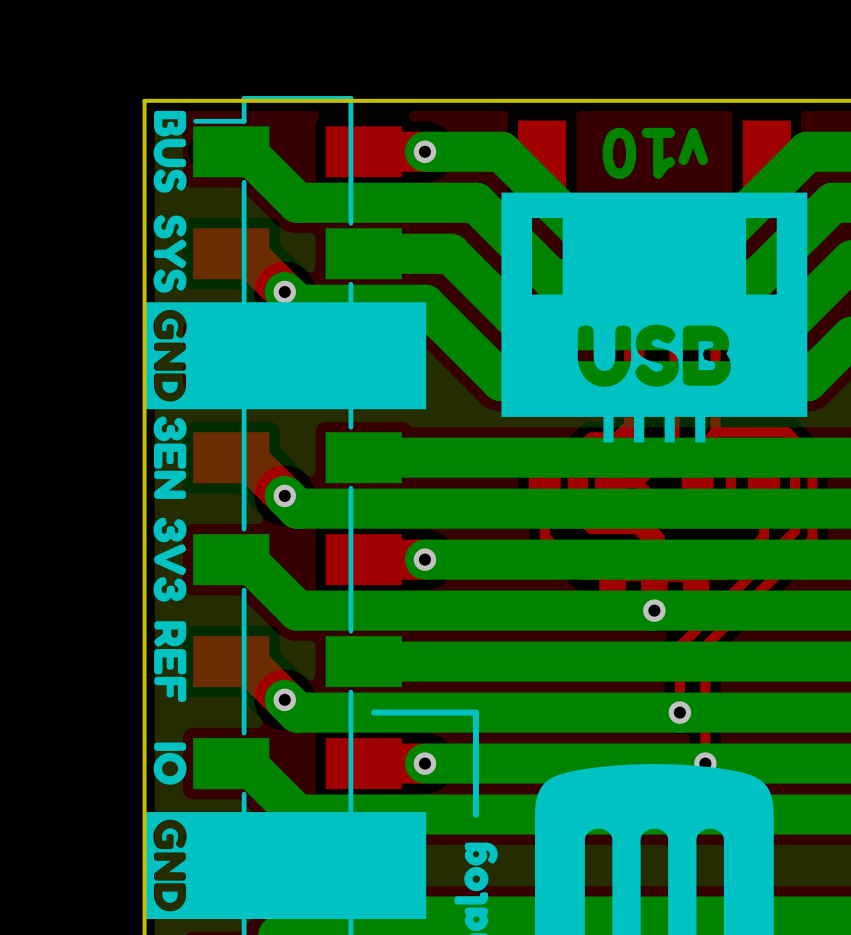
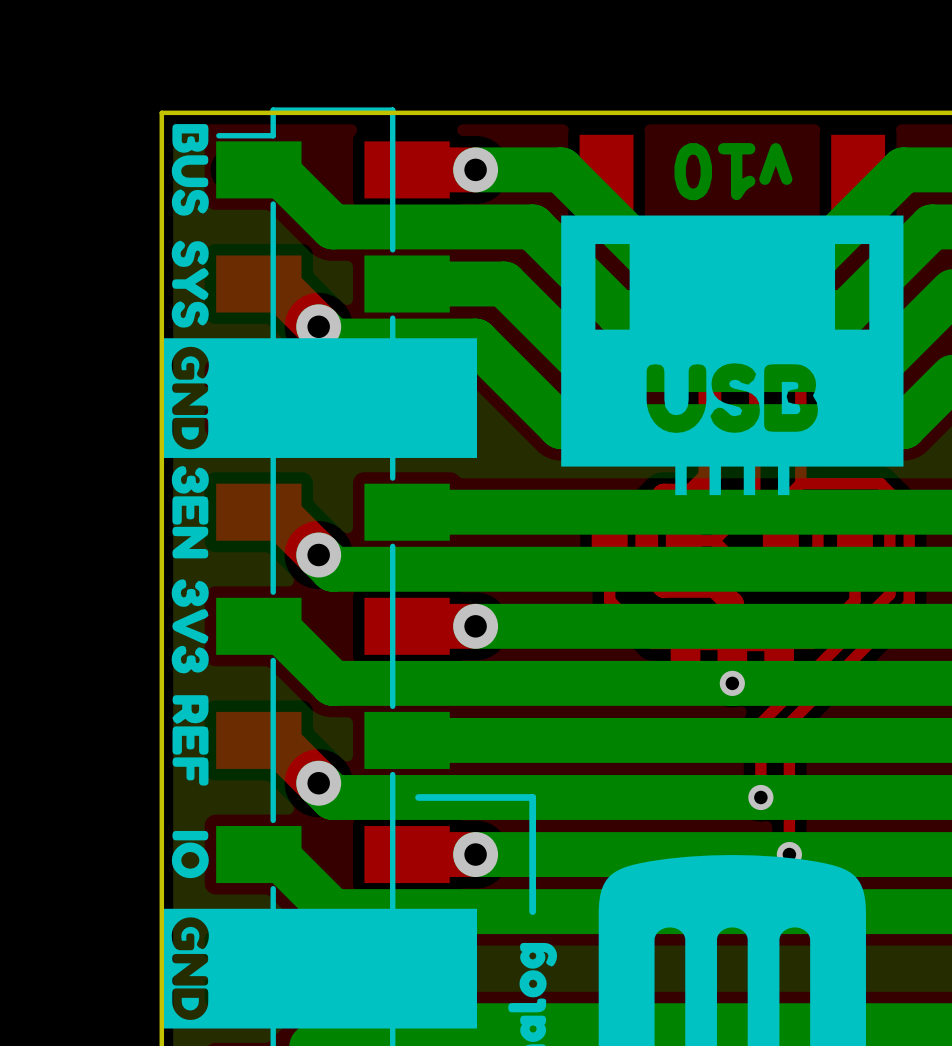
via size: [413, 140, 437, 164] -> [453, 147, 499, 193]
via size: [273, 280, 297, 304] -> [296, 304, 342, 350]
via size: [273, 484, 297, 508] -> [296, 532, 342, 578]
via size: [413, 548, 437, 571] -> [453, 603, 499, 649]
via size: [273, 688, 297, 712] -> [296, 760, 342, 806]
via size: [413, 752, 437, 775] -> [453, 832, 499, 878]

